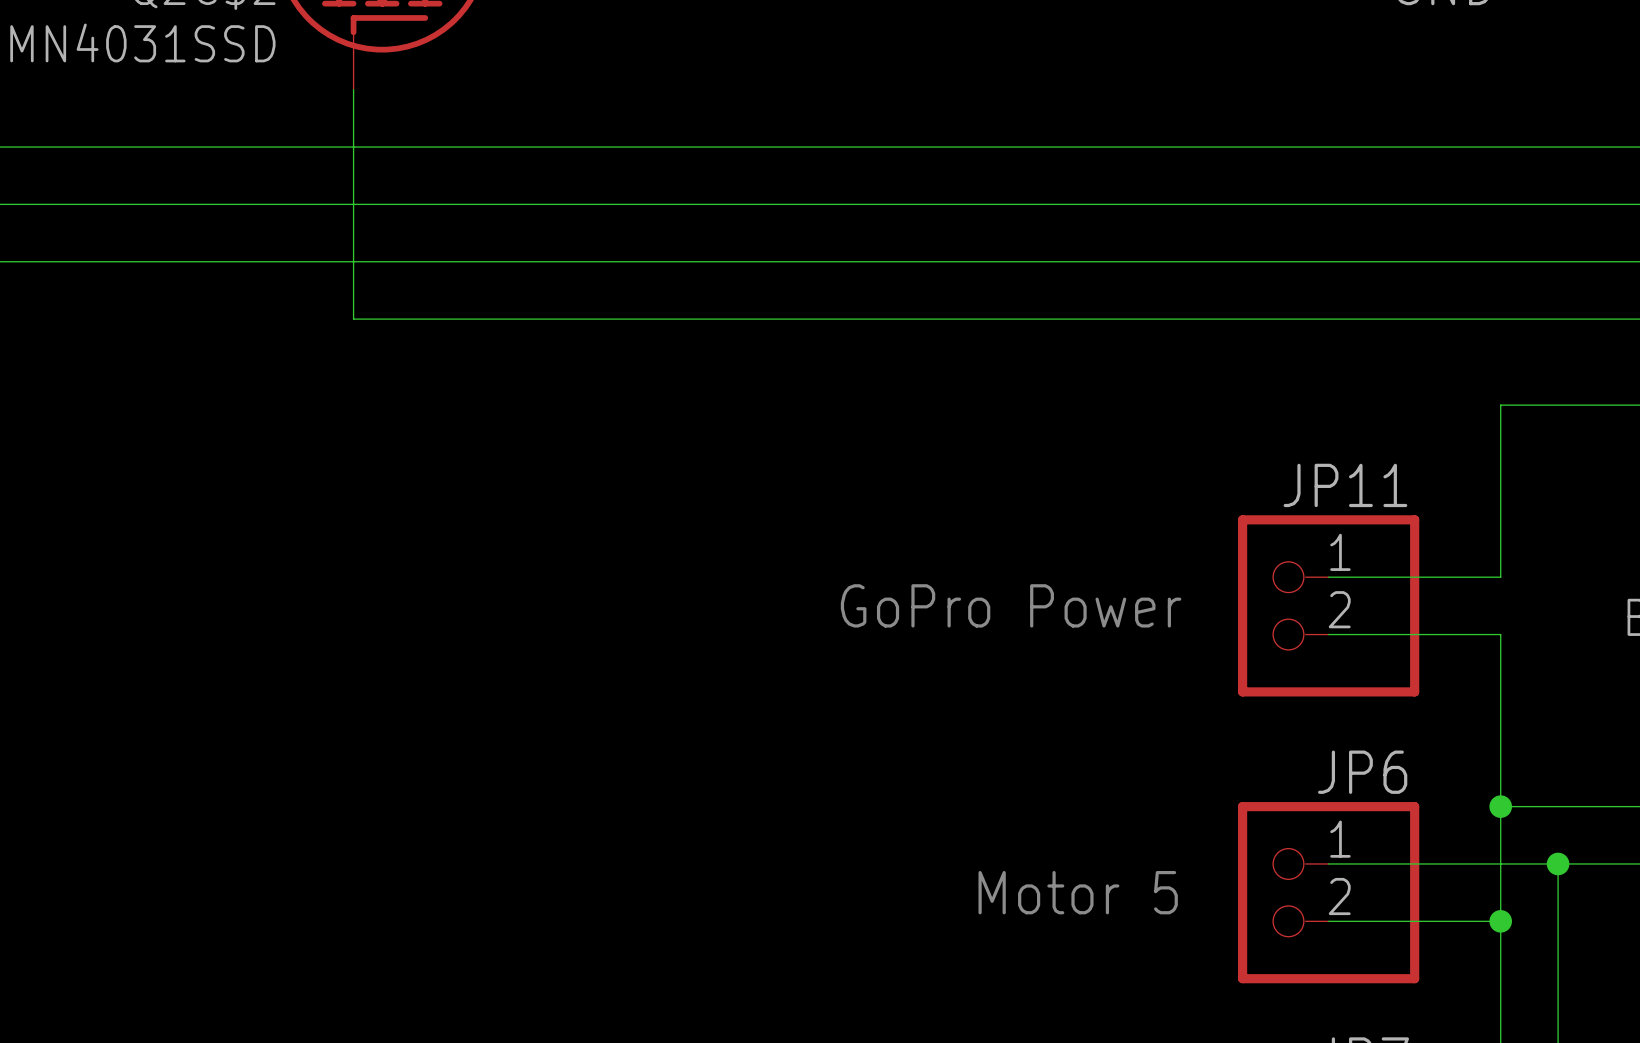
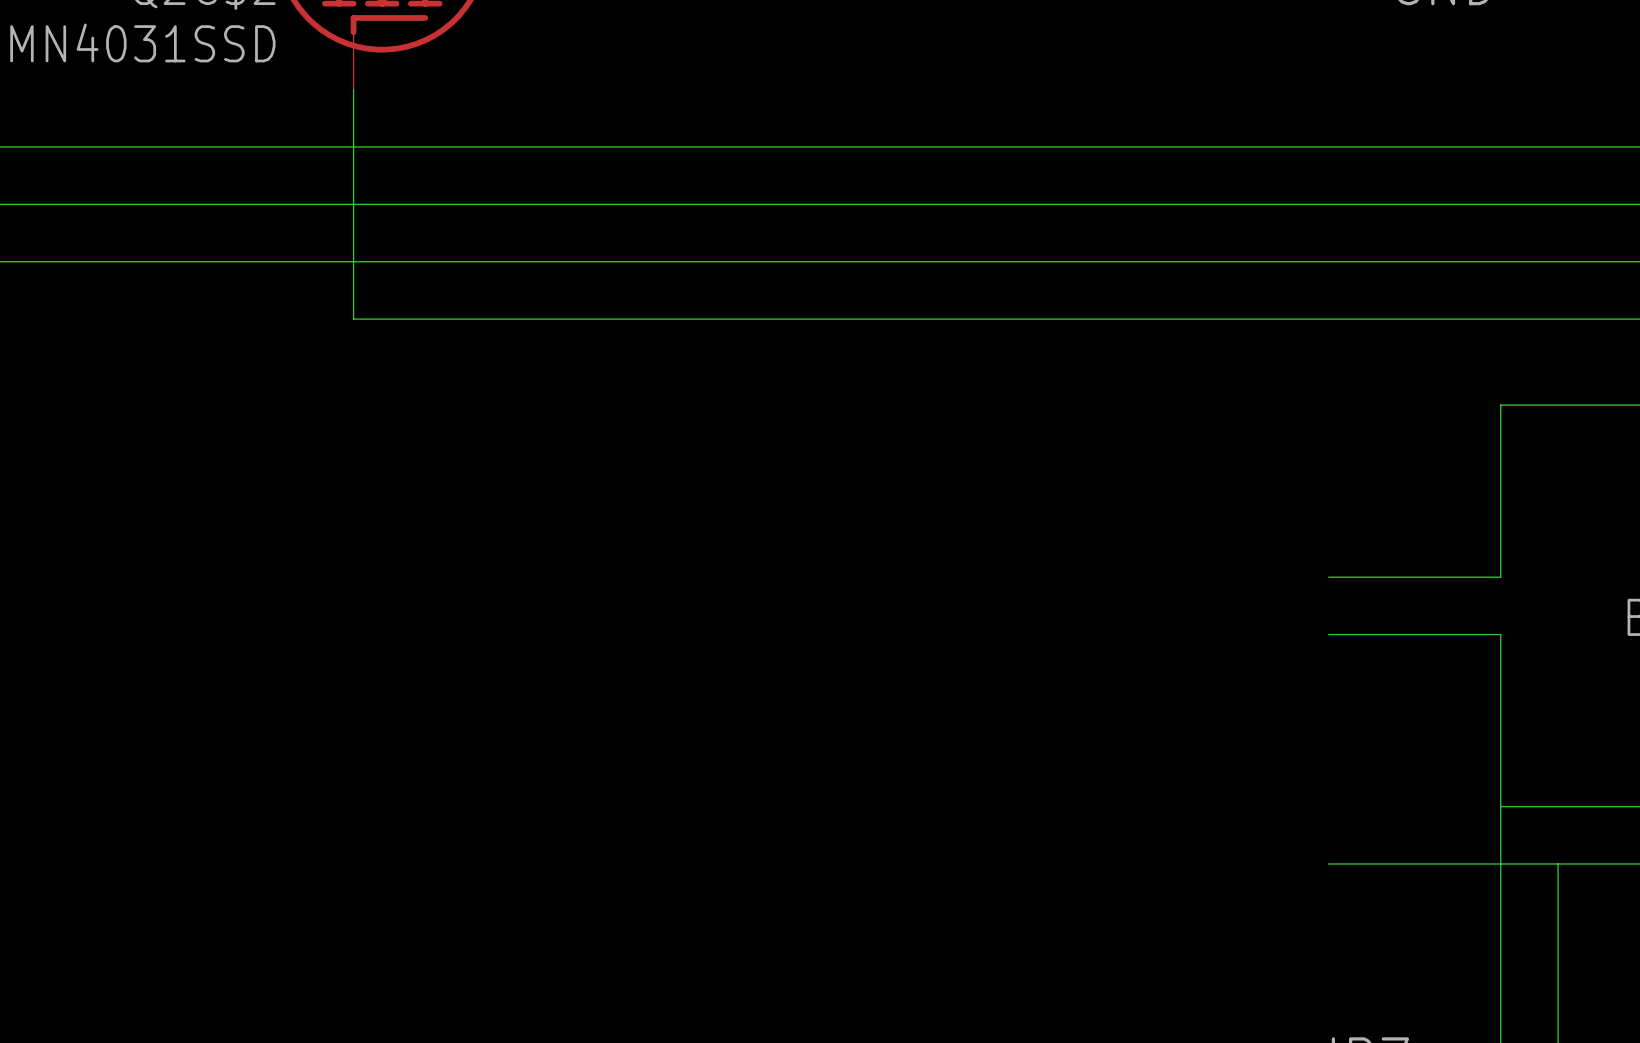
text: GoPro Power (1011, 605) -> none
JP11: (1328, 605) -> none
junction: (1500, 806) -> none
junction: (1558, 863) -> none
text: Motor 5 (1078, 892) -> none
JP6: (1328, 892) -> none
wire: (1328, 921) (1500, 921) -> none
junction: (1500, 921) -> none

